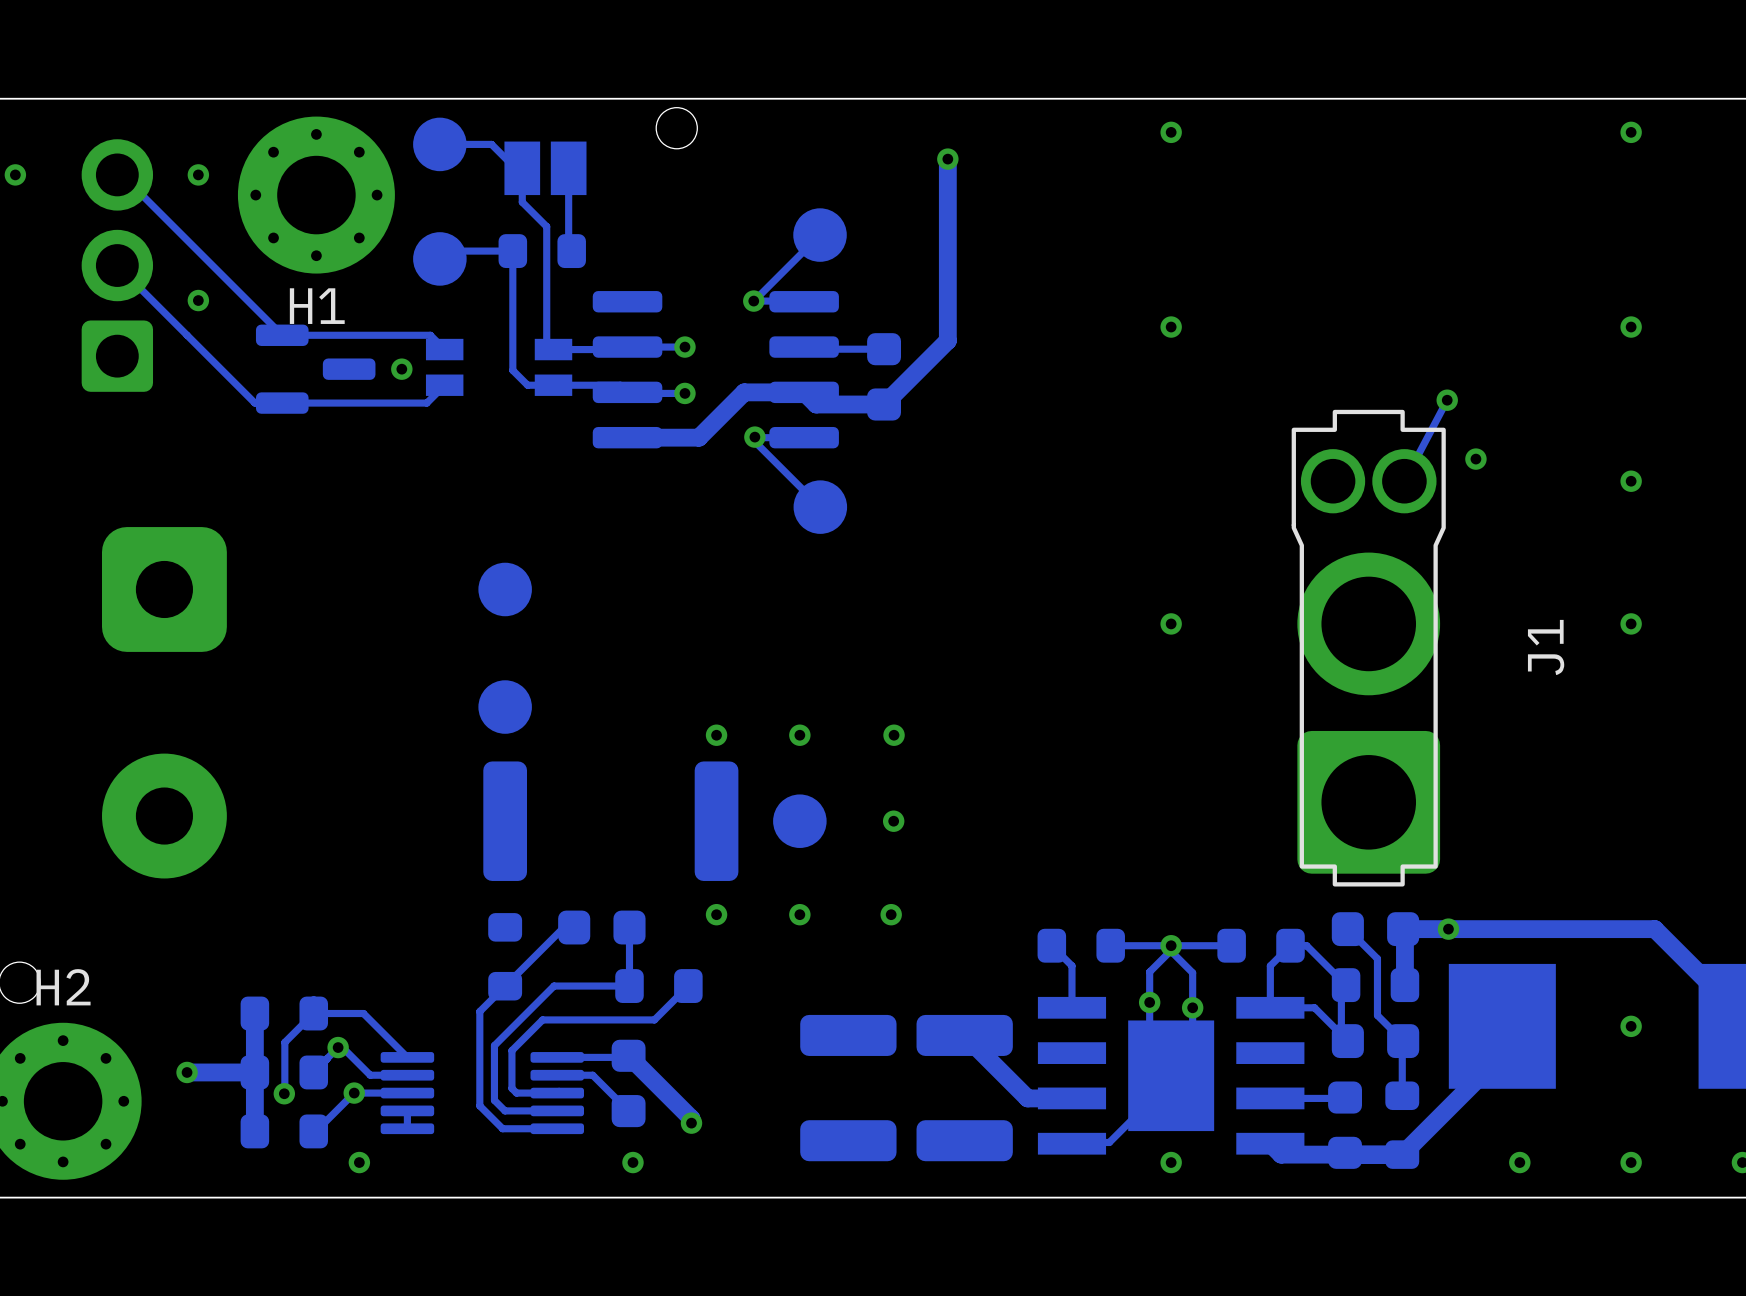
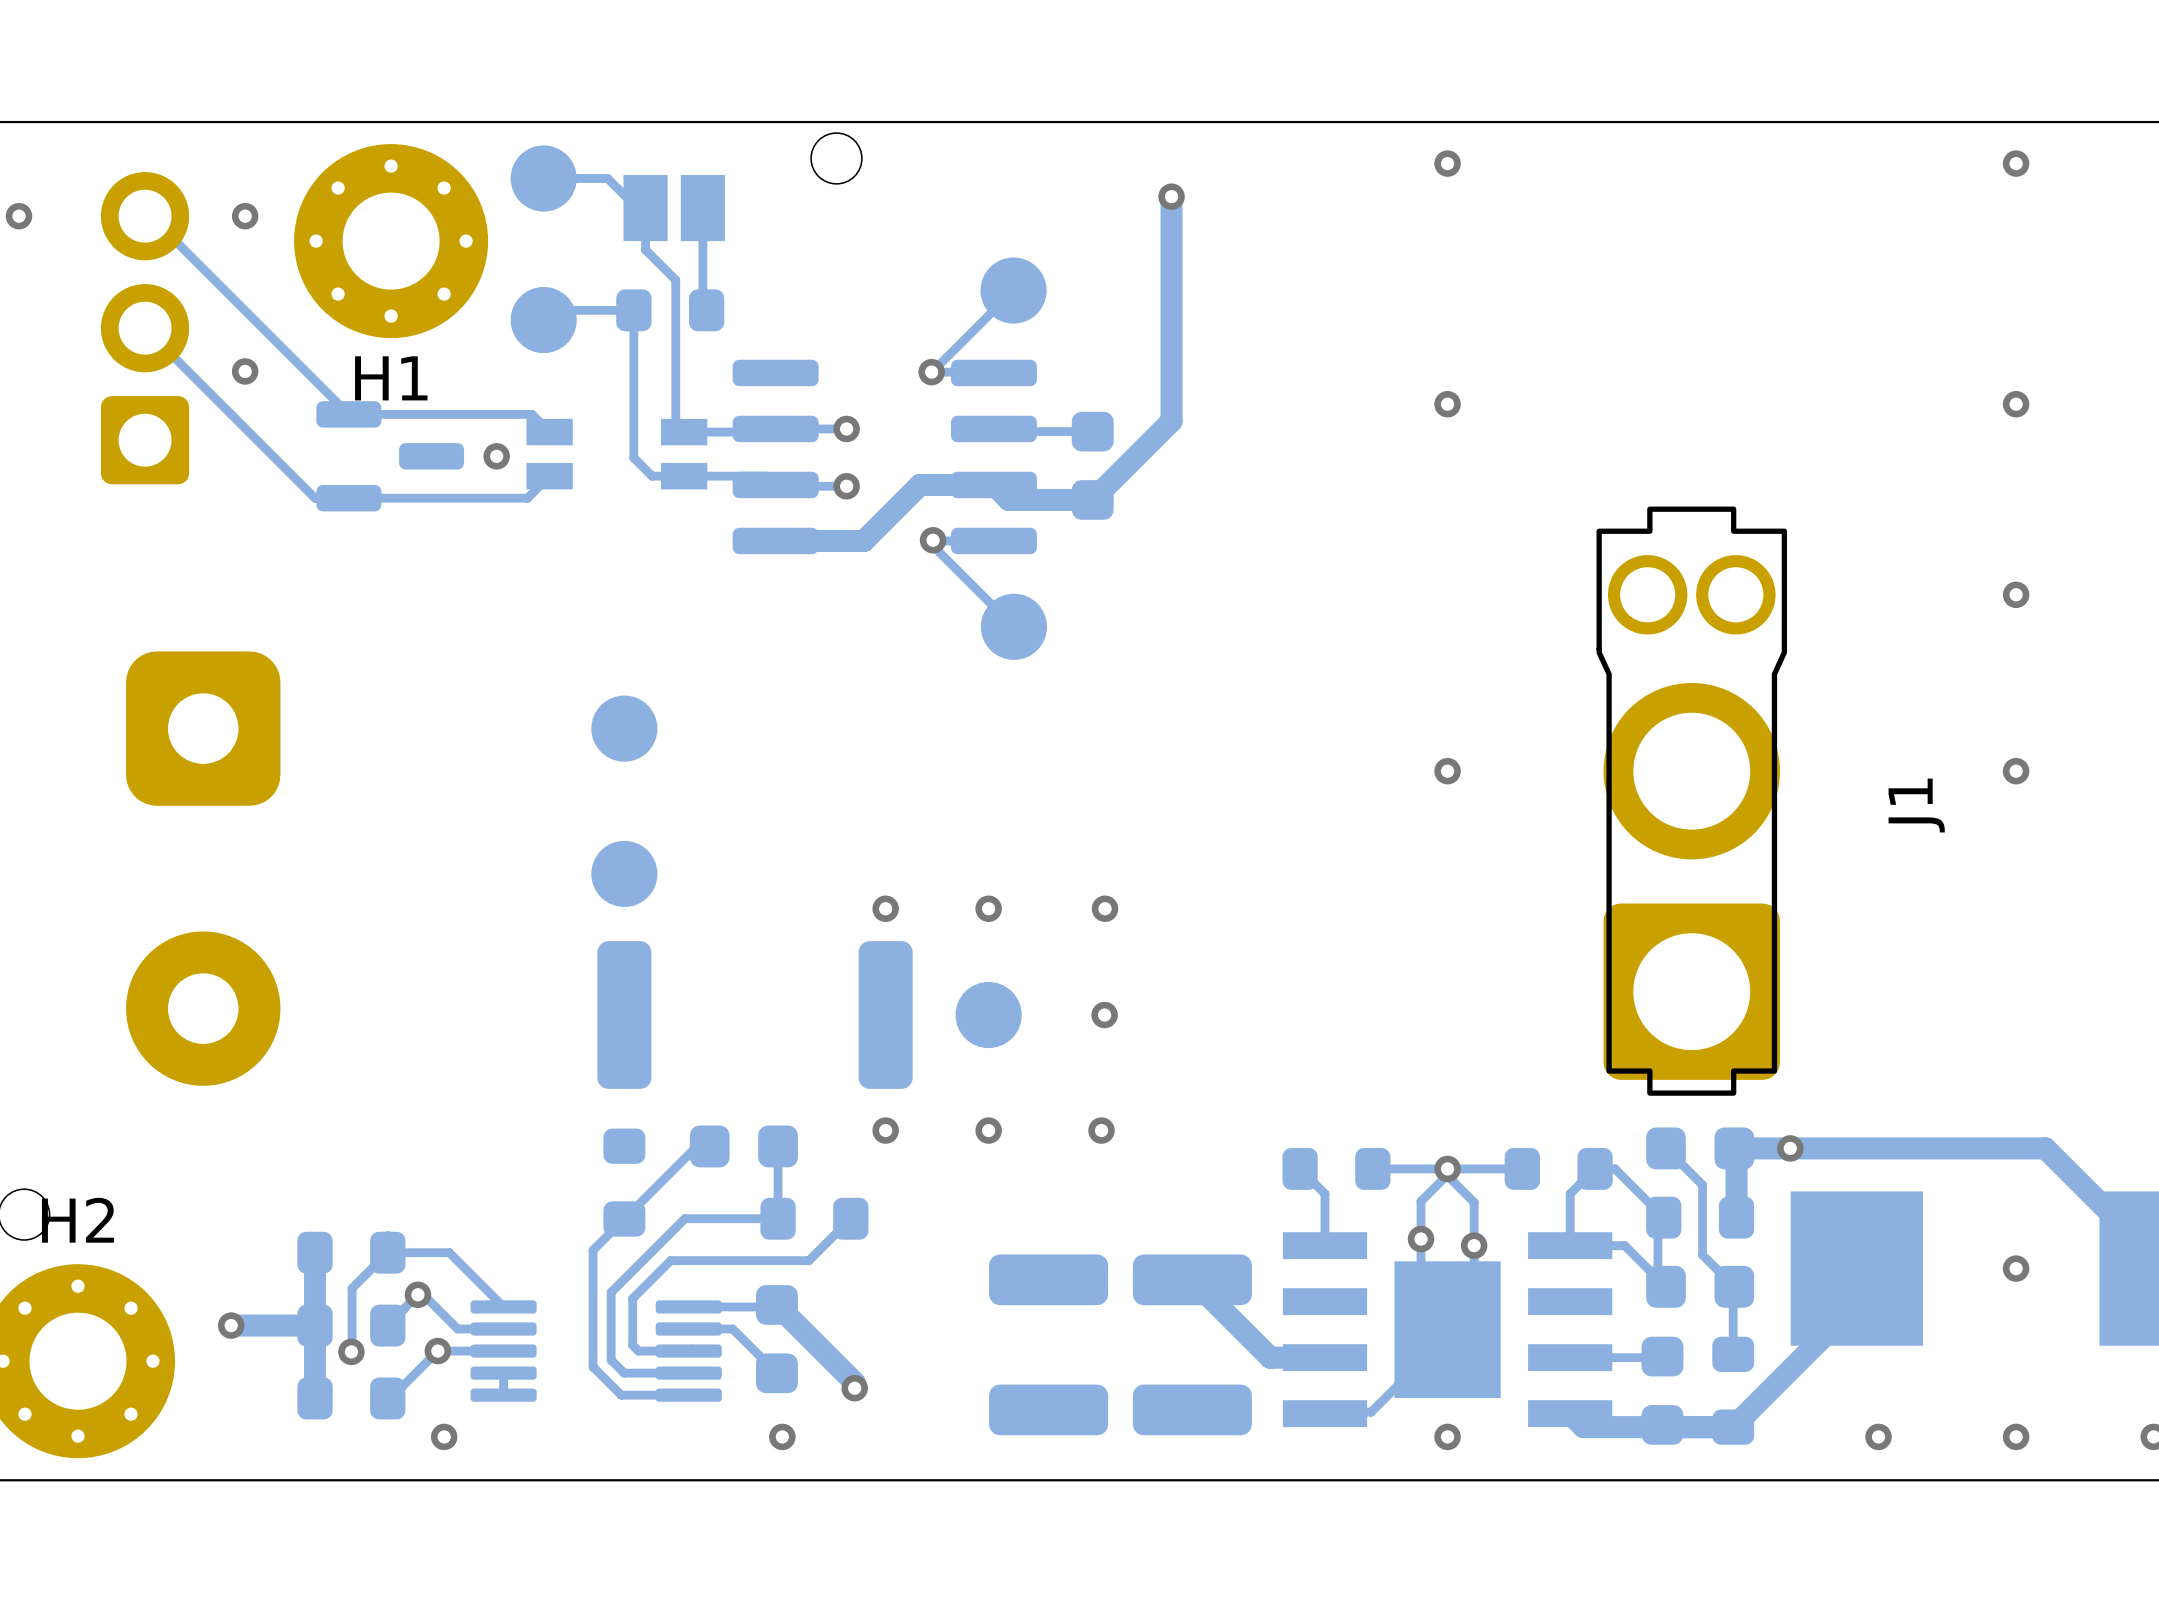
bottom track: (1447, 400) (1404, 481) -> none
via: (1447, 400) -> none
via: (1475, 459) -> none

